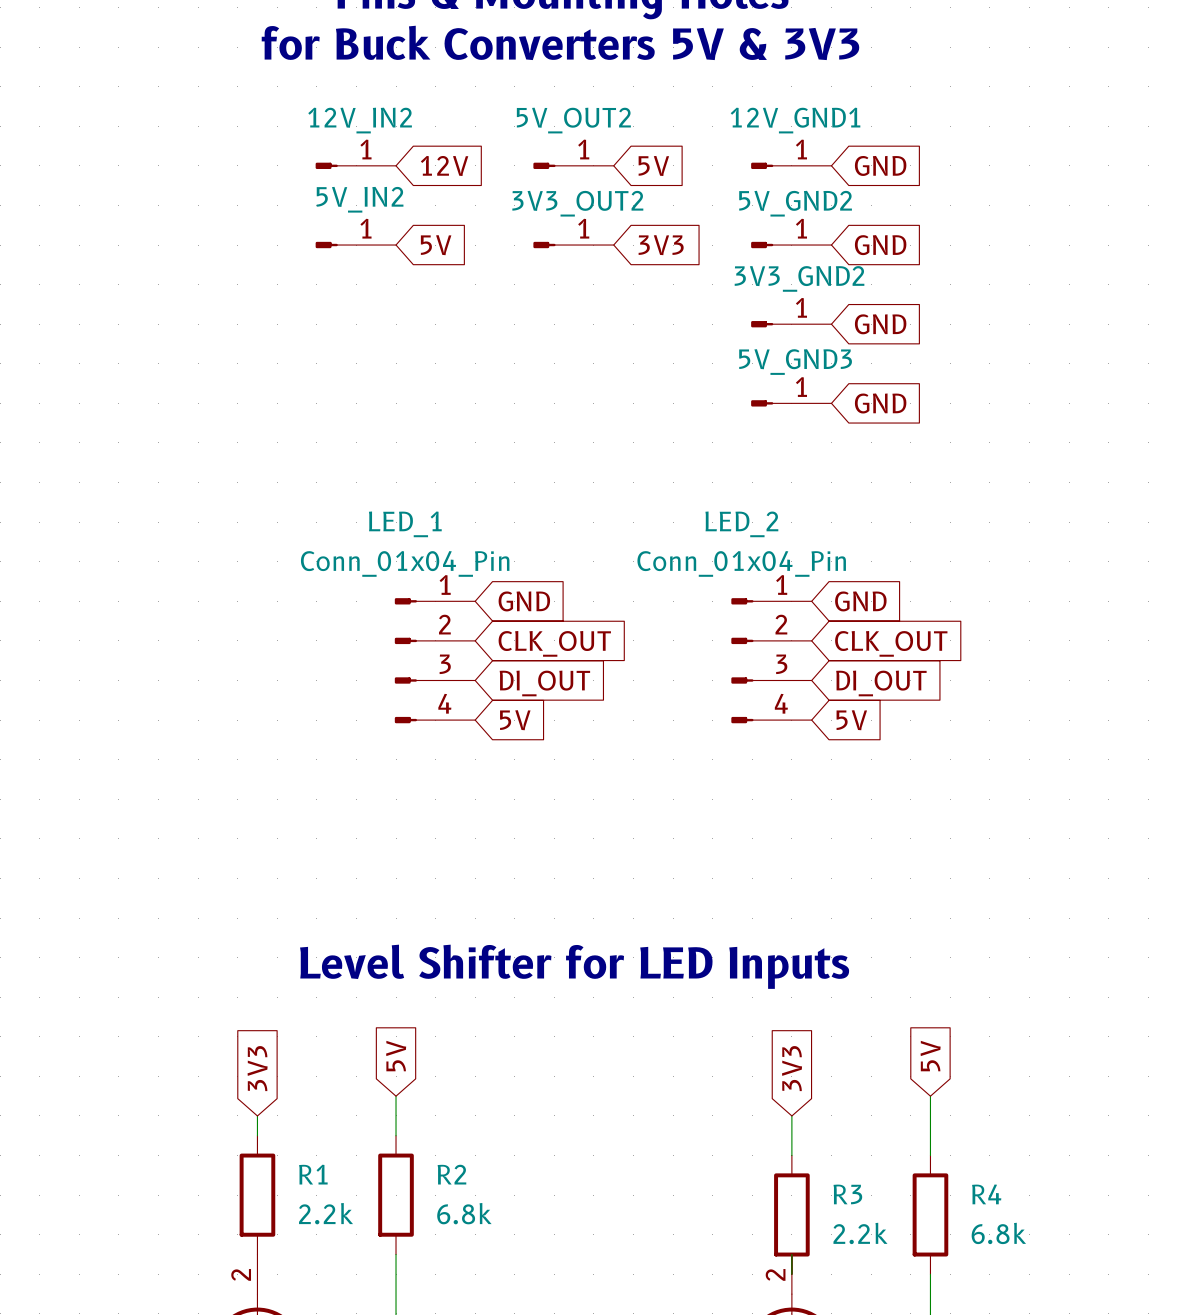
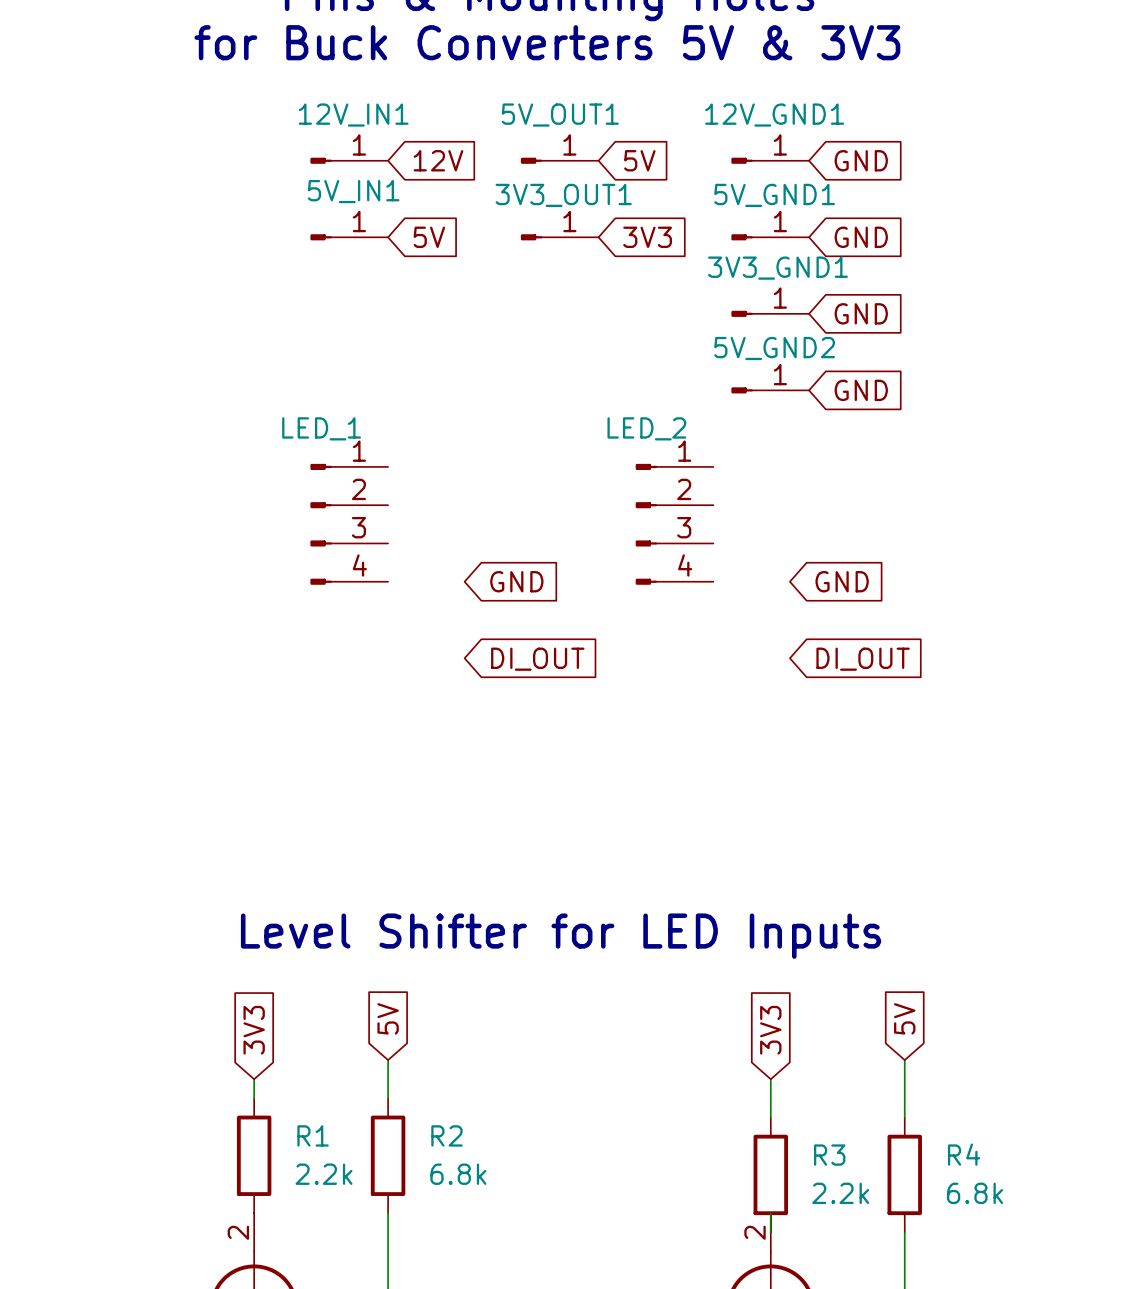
12V_IN2 name: 12V_IN2 (360, 120) -> 12V_IN1 (353, 115)
5V_OUT2 name: 5V_OUT2 (573, 120) -> 5V_OUT1 (560, 115)
5V_IN2 name: 5V_IN2 (360, 199) -> 5V_IN1 (353, 191)
3V3_OUT2 name: 3V3_OUT2 (577, 203) -> 3V3_OUT1 (563, 195)
5V_GND2 name: 5V_GND2 (795, 203) -> 5V_GND1 (774, 195)
3V3_GND2 name: 3V3_GND2 (799, 278) -> 3V3_GND1 (777, 268)
5V_GND3 name: 5V_GND3 (795, 362) -> 5V_GND2 (774, 348)
LED_1 name position: LED_1 (405, 524) -> LED_1 (321, 428)
LED_2 name position: LED_2 (741, 524) -> LED_2 (646, 428)
LED_1 value: Conn_01x04_Pin (405, 563) -> none
LED_2 value: Conn_01x04_Pin (741, 563) -> none
global label: CLK_OUT (554, 643) -> none
global label: CLK_OUT (891, 643) -> none
LED_1 position: (435, 660) -> (349, 524)
LED_2 position: (771, 660) -> (674, 524)
global label: 5V (515, 720) -> none
global label: 5V (851, 720) -> none

